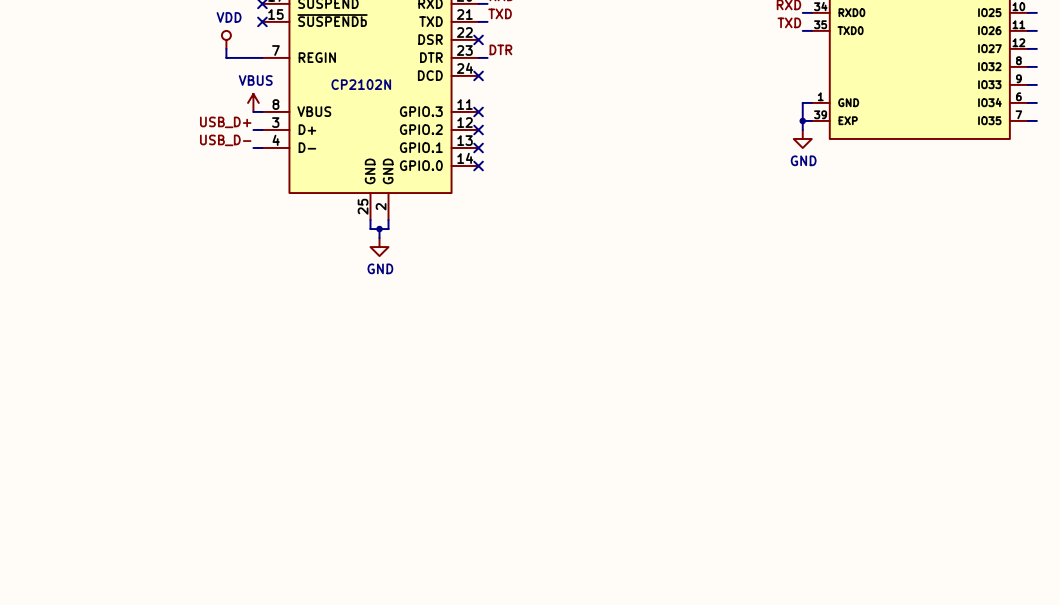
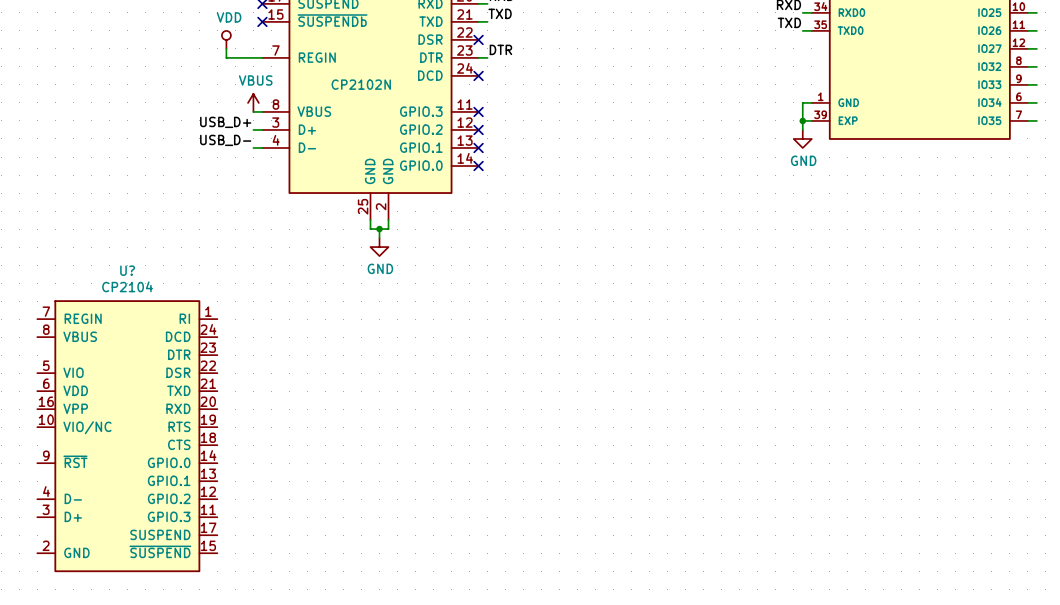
U?: none -> CP2104 (127, 436)

